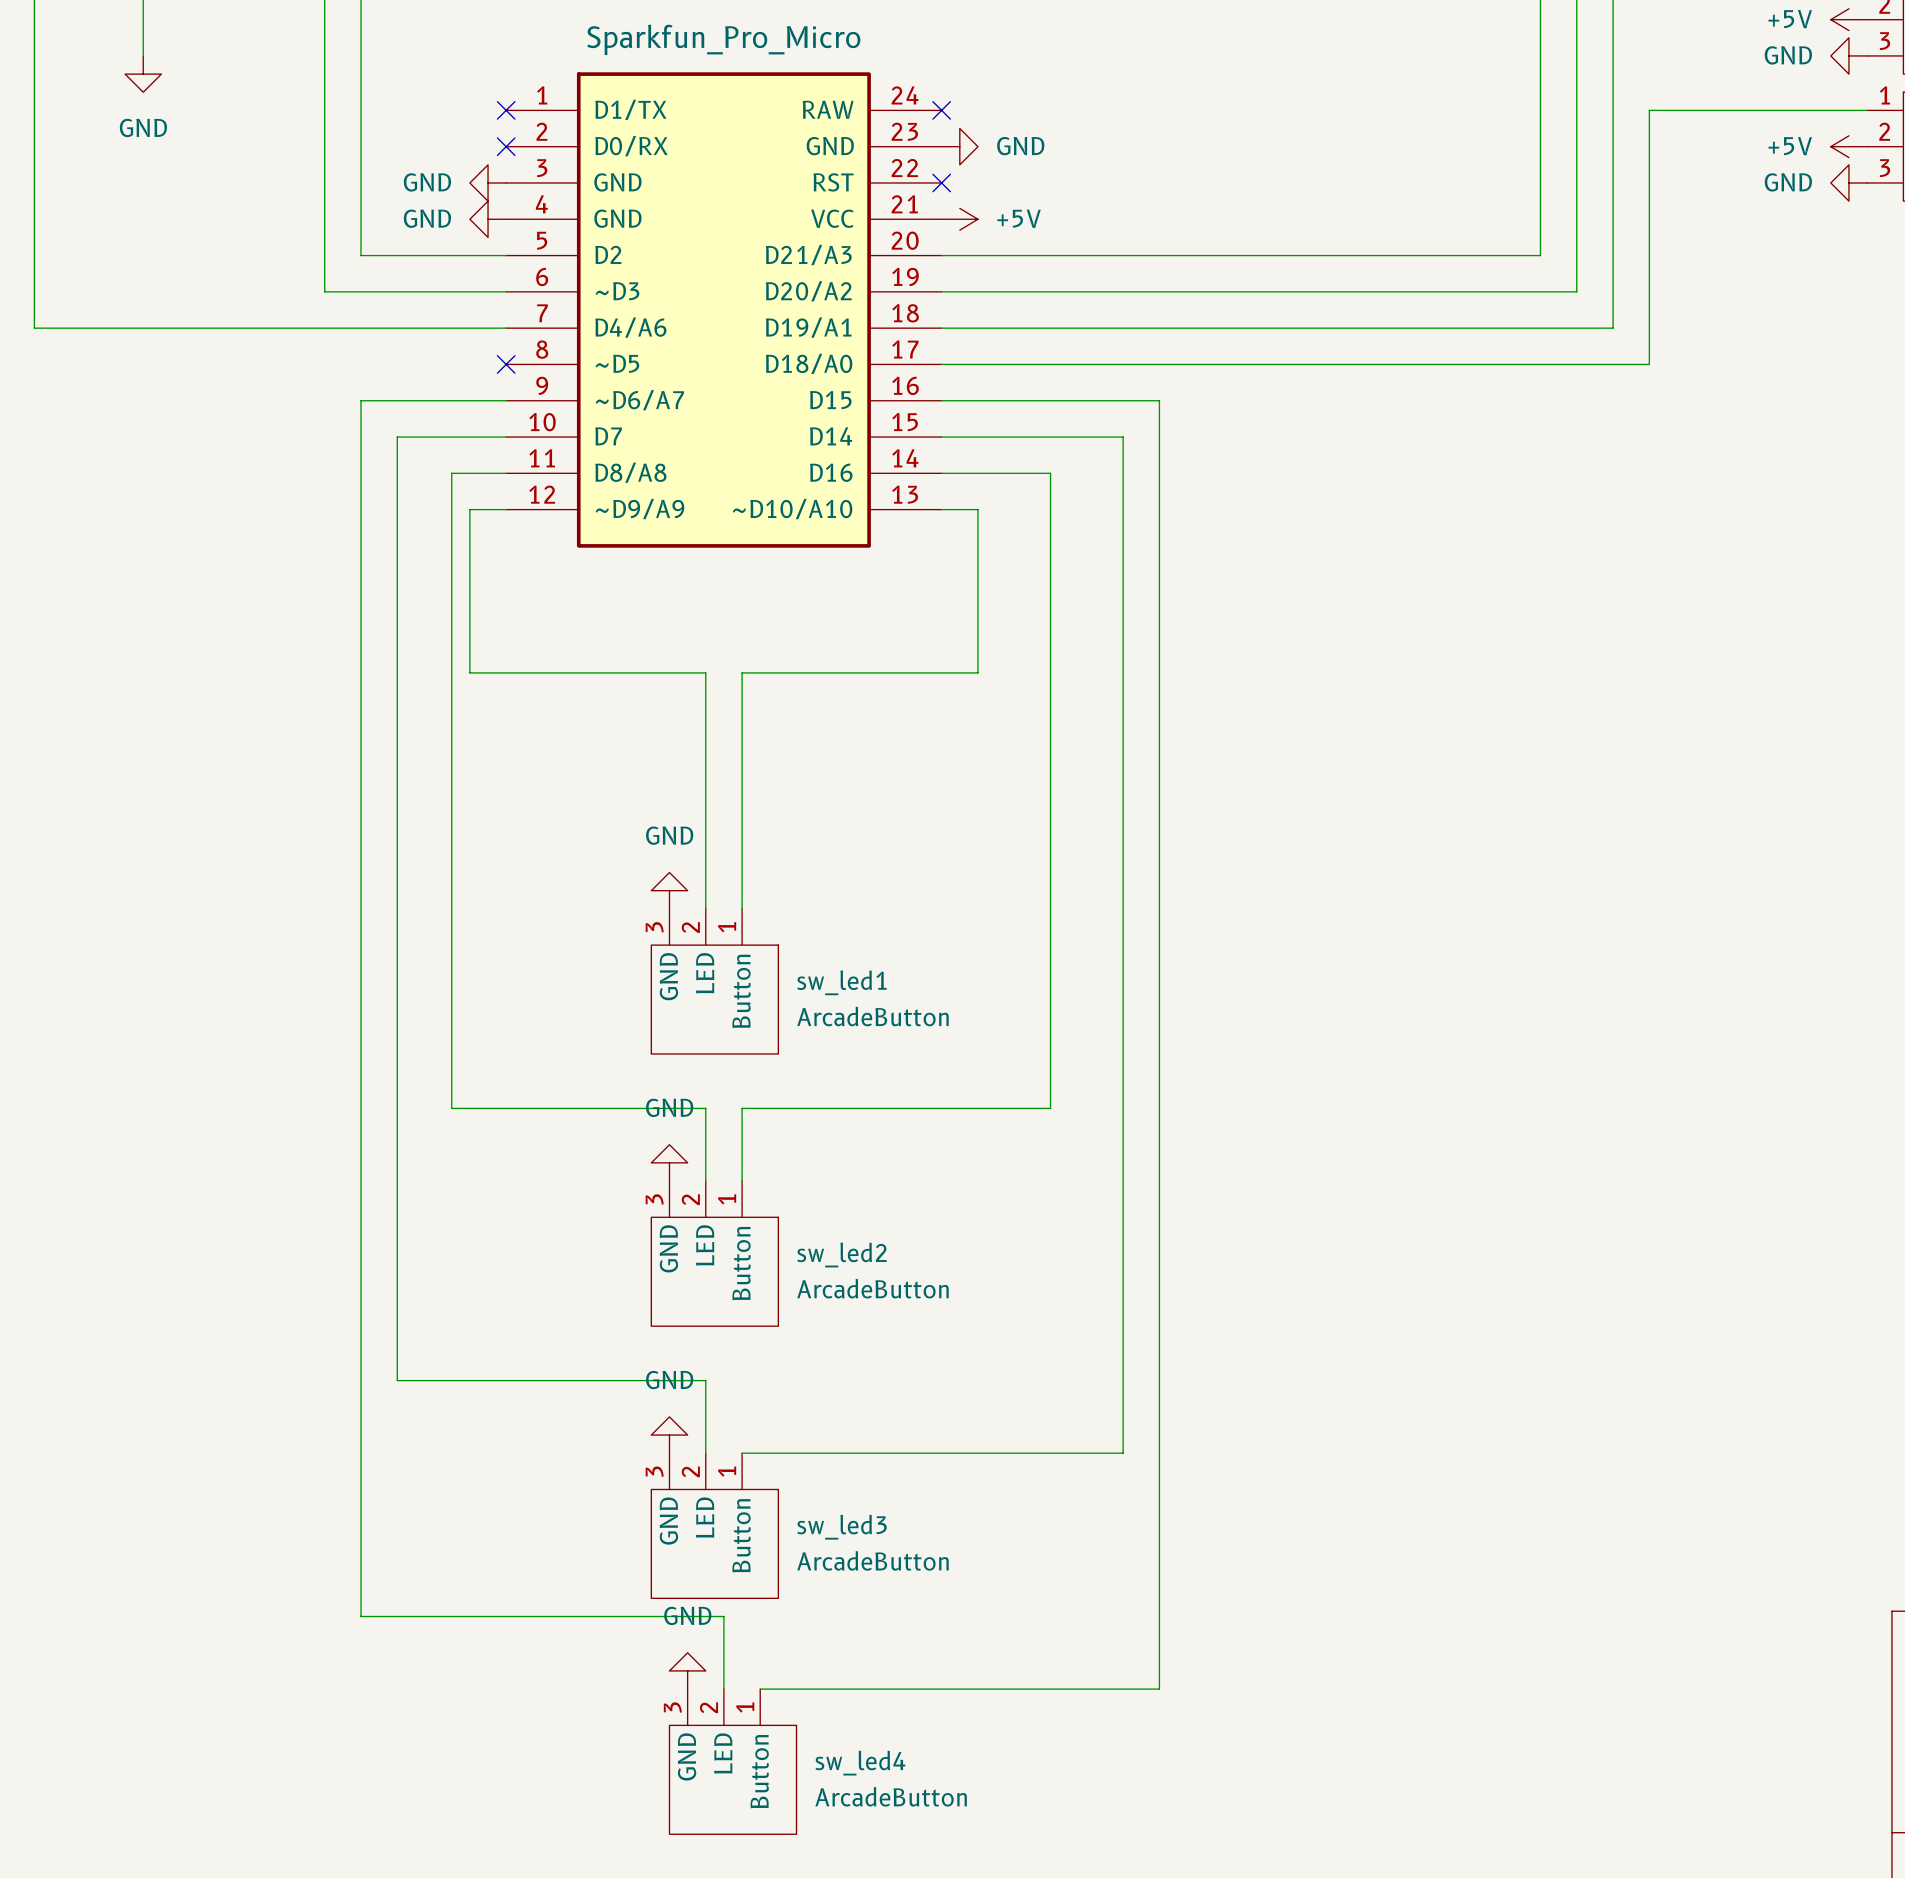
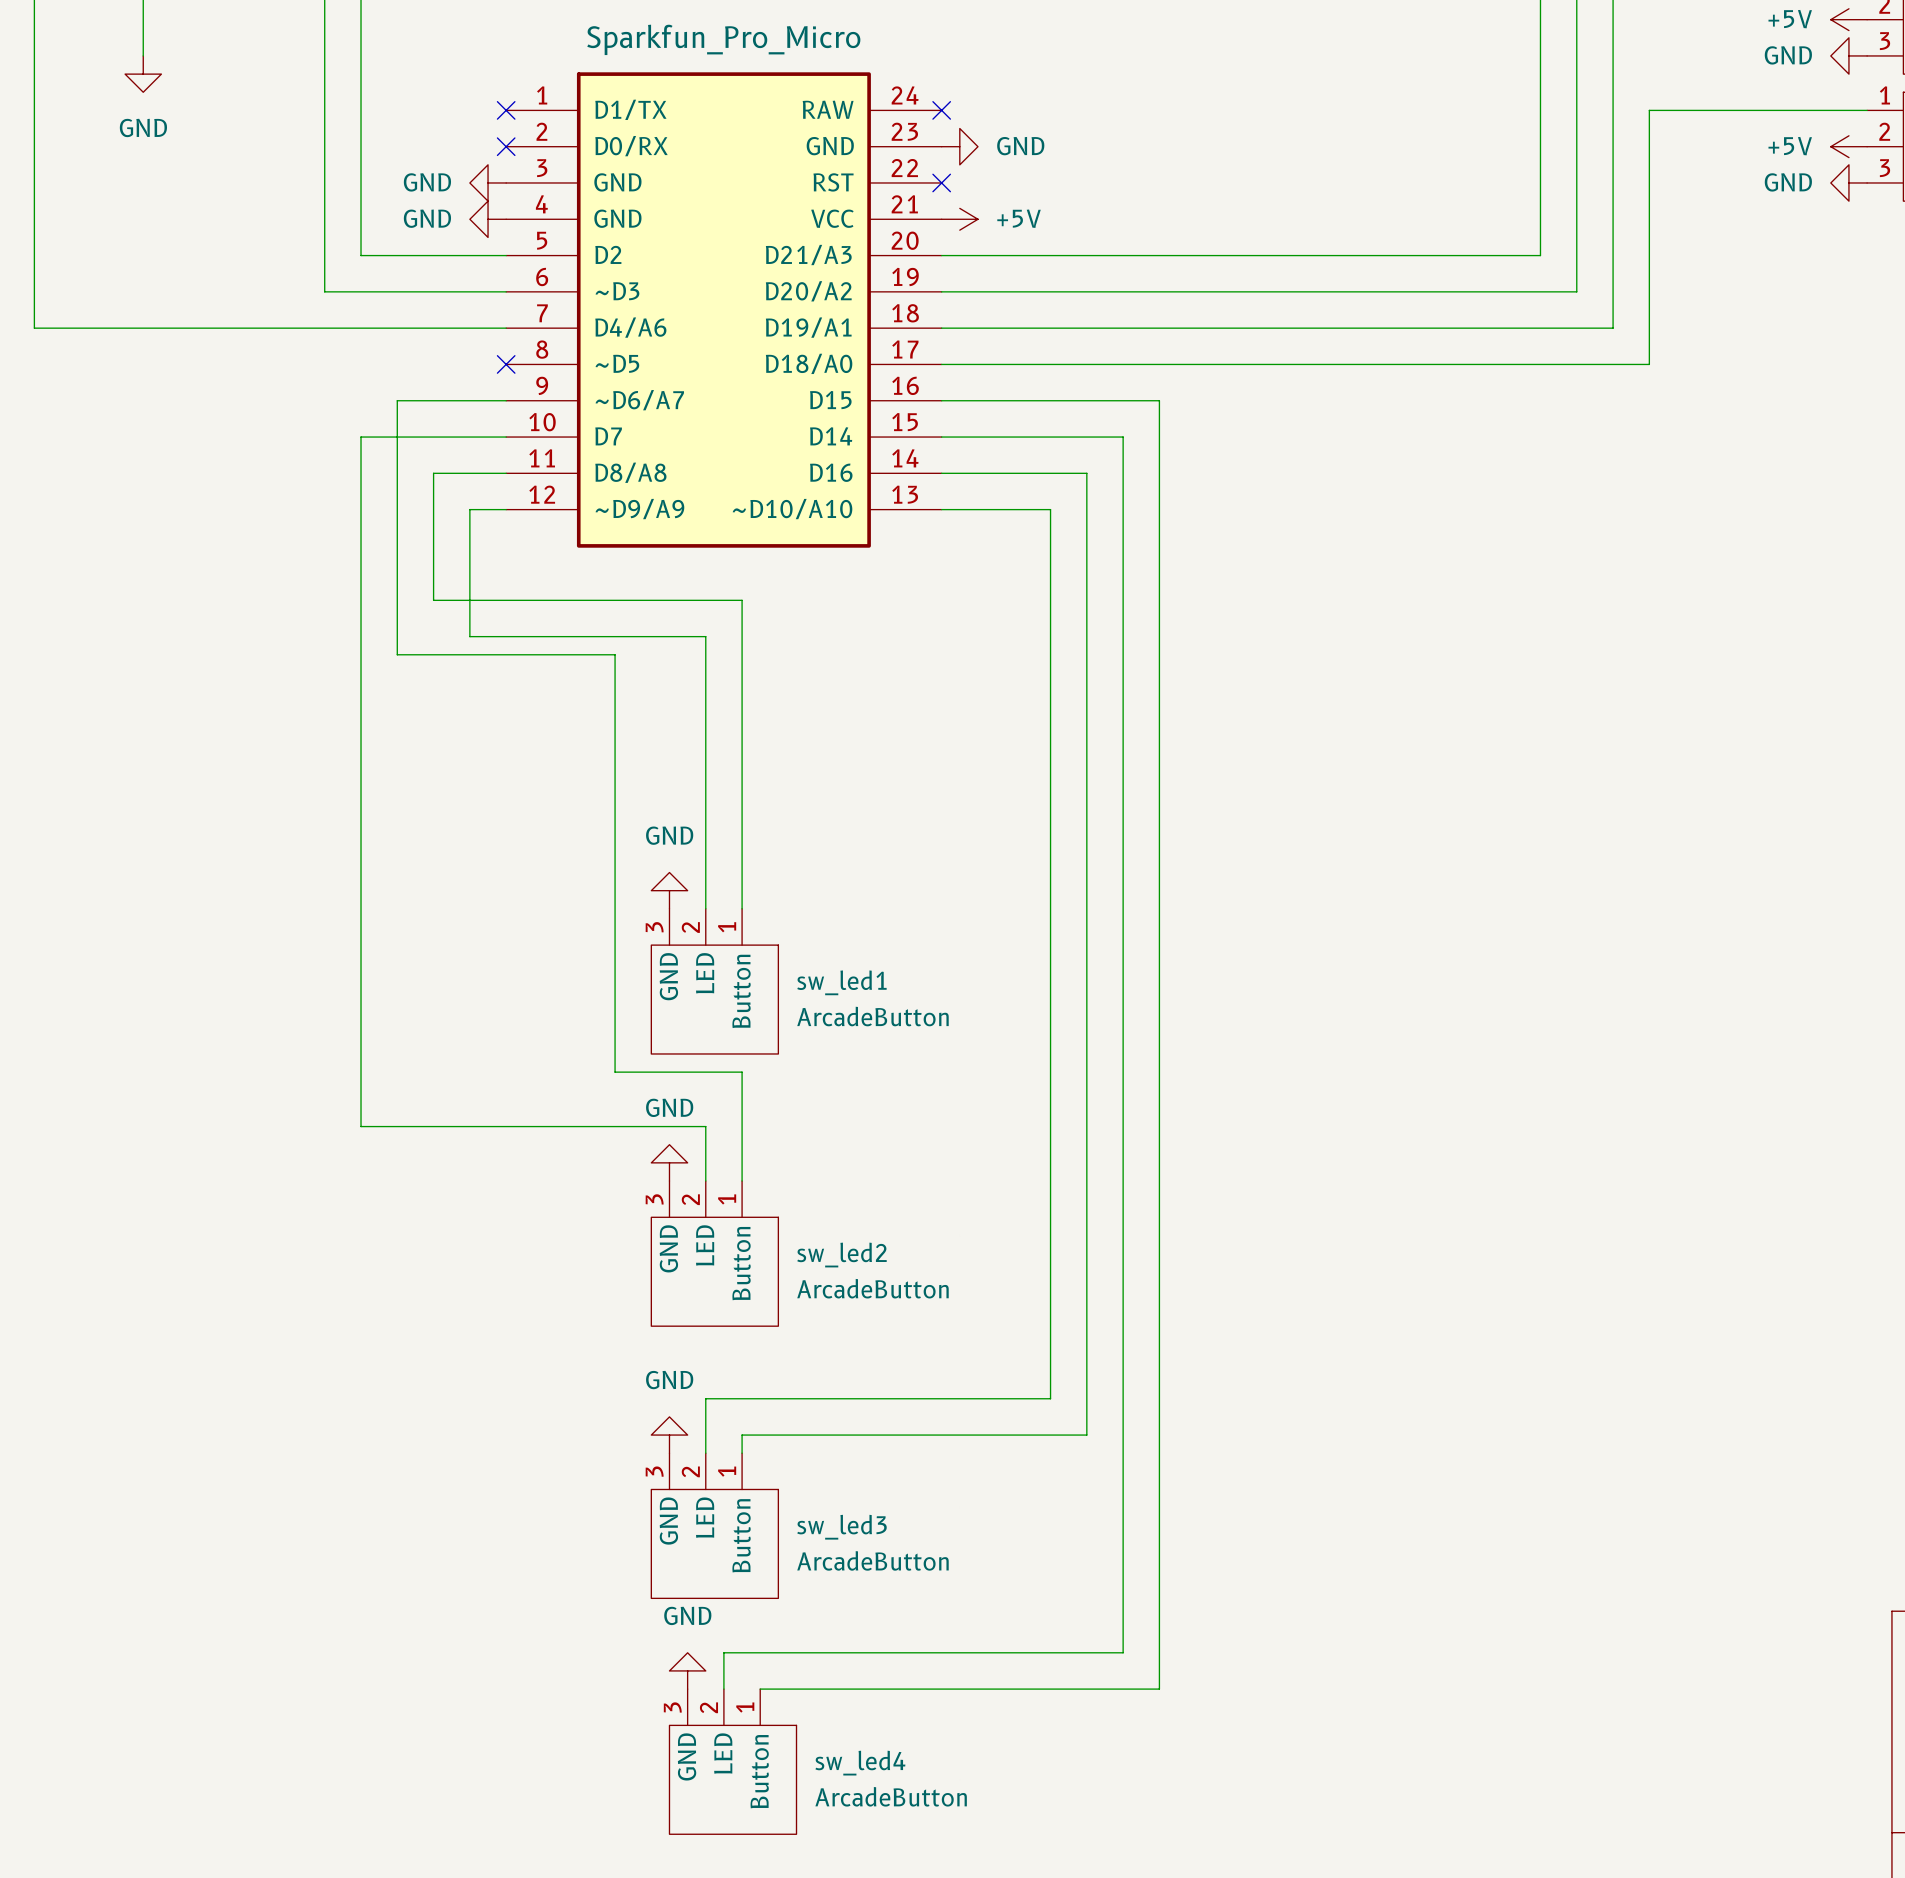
wire: (397, 400) (361, 400) (361, 437) -> (397, 400) (397, 437) (361, 437)
wire: (451, 473) (451, 1108) (705, 1108) (705, 1126) -> (451, 473) (433, 473) (433, 600) (742, 600) (742, 672)
wire: (1050, 473) (1050, 509) -> (977, 509) (1050, 509)
wire: none -> (1050, 473) (1086, 473) (1086, 1435) (742, 1435) (742, 1453)
wire: (977, 509) (977, 672) (742, 672) -> none
wire: (469, 636) (469, 672) (705, 672) -> (469, 636) (705, 636) (705, 672)
wire: (397, 654) (397, 1380) (705, 1380) (705, 1398) -> (397, 654) (615, 654) (615, 1072) (742, 1072) (742, 1108)
wire: (742, 1108) (1050, 1108) -> (705, 1398) (1050, 1398) (1050, 1108)
wire: (361, 1126) (361, 1616) (723, 1616) (723, 1652) -> (361, 1126) (705, 1126)
wire: (742, 1453) (1123, 1453) -> (723, 1652) (1123, 1652) (1123, 1453)

